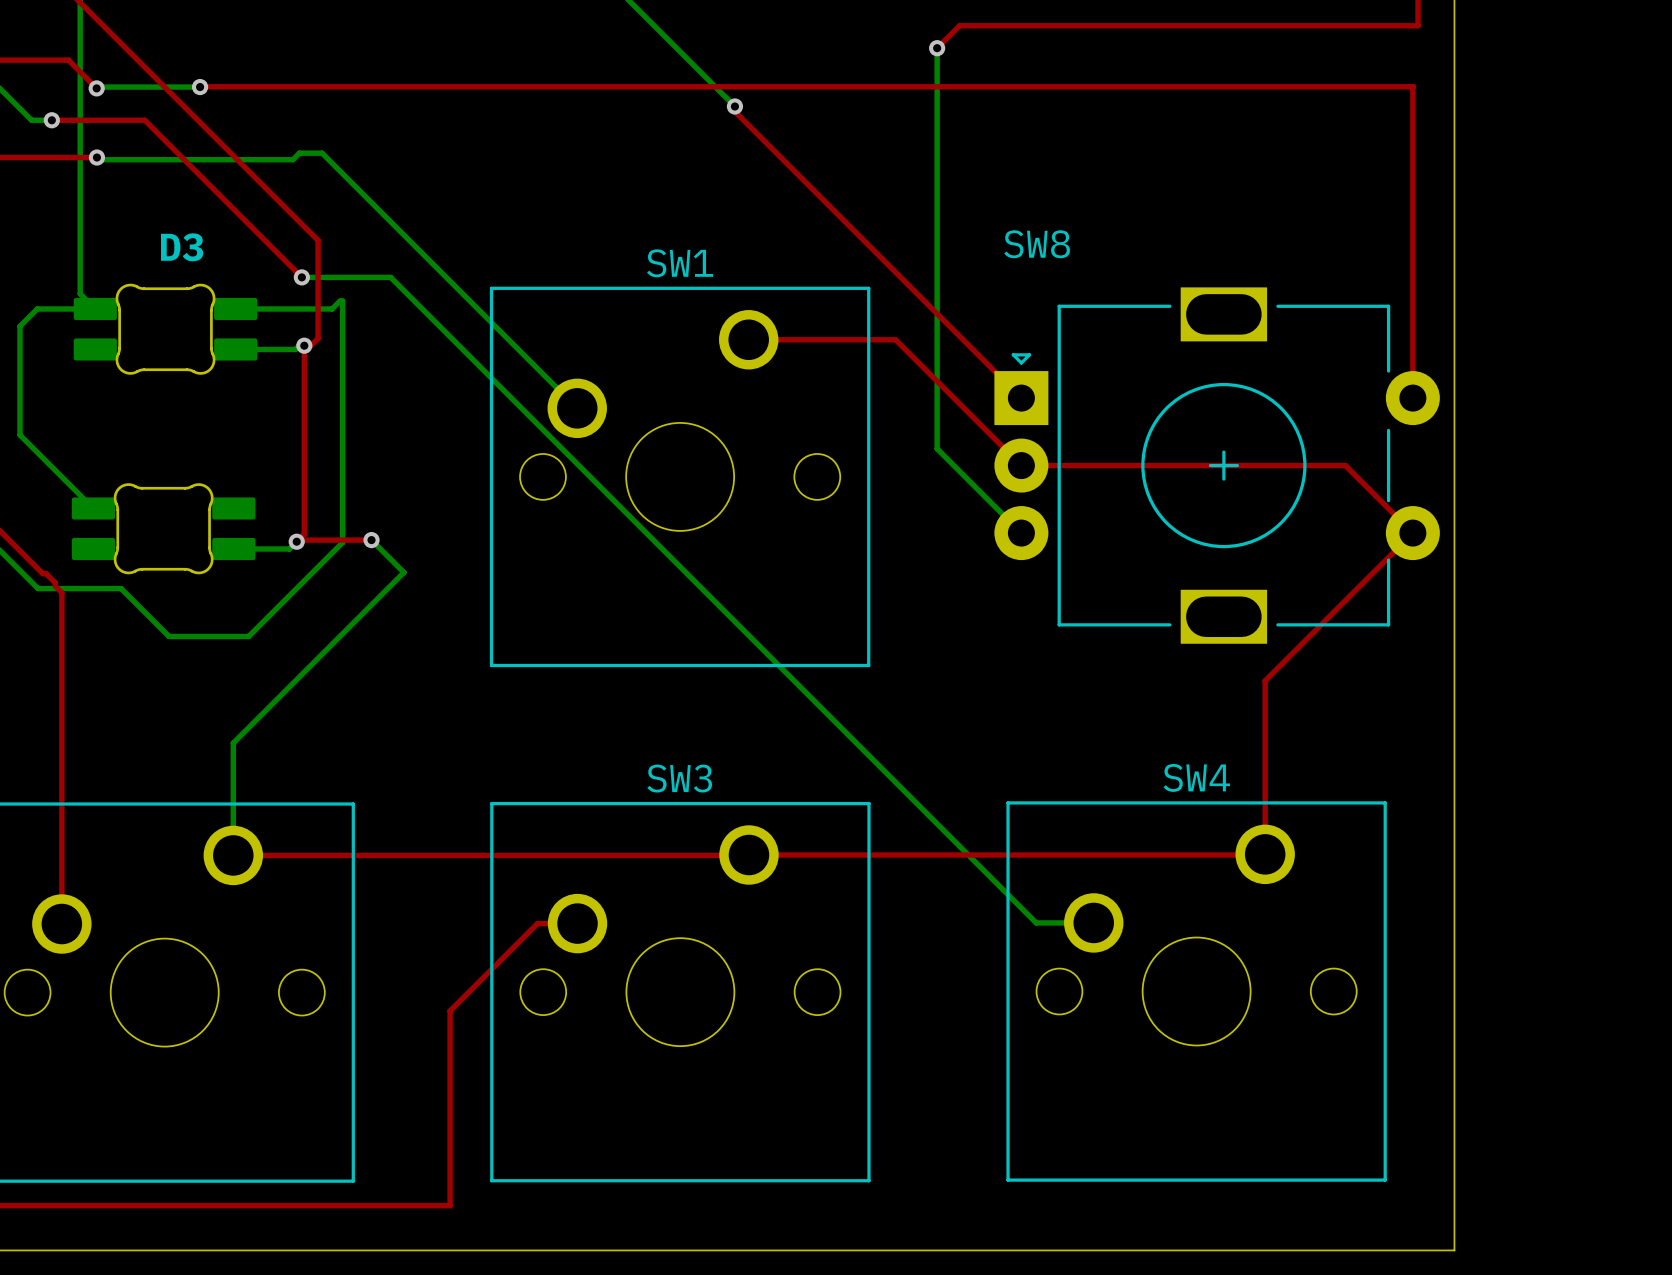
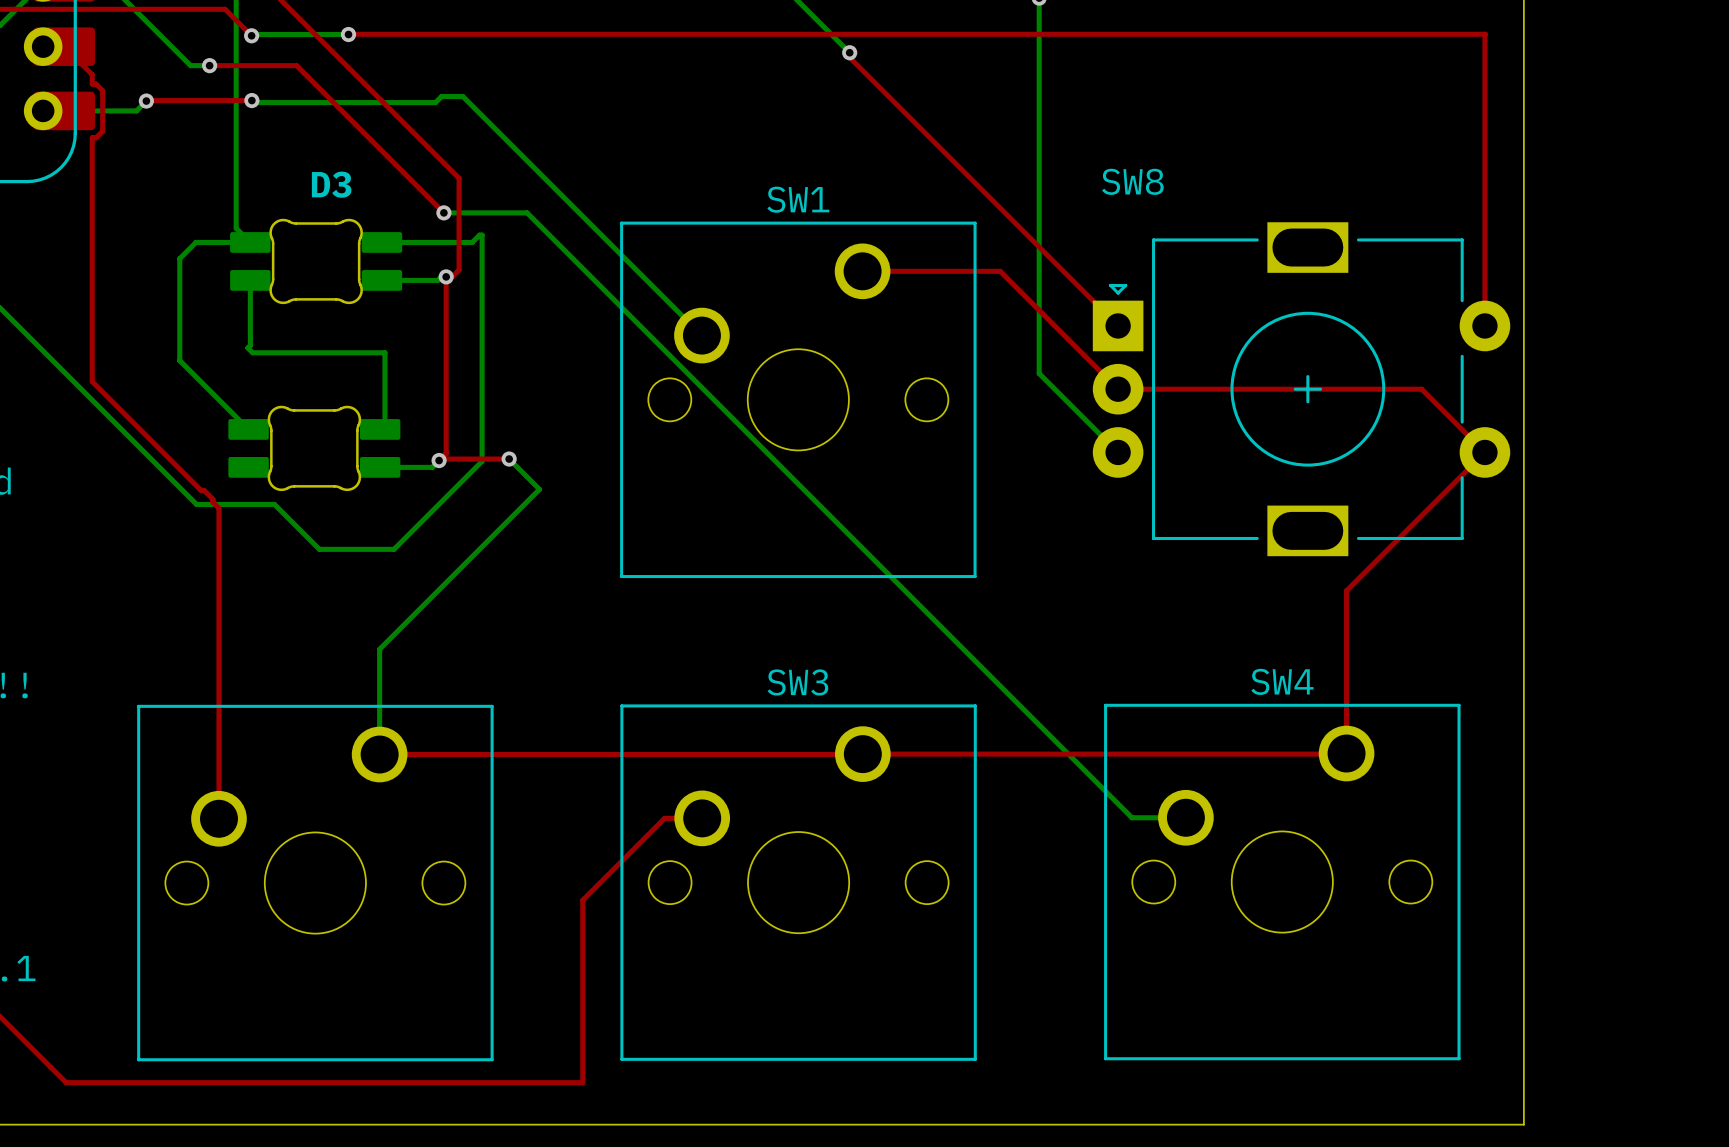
bottom track: none -> (250, 280) (250, 345) (247, 347) (252, 352) (384, 352) (384, 424) (380, 429)

